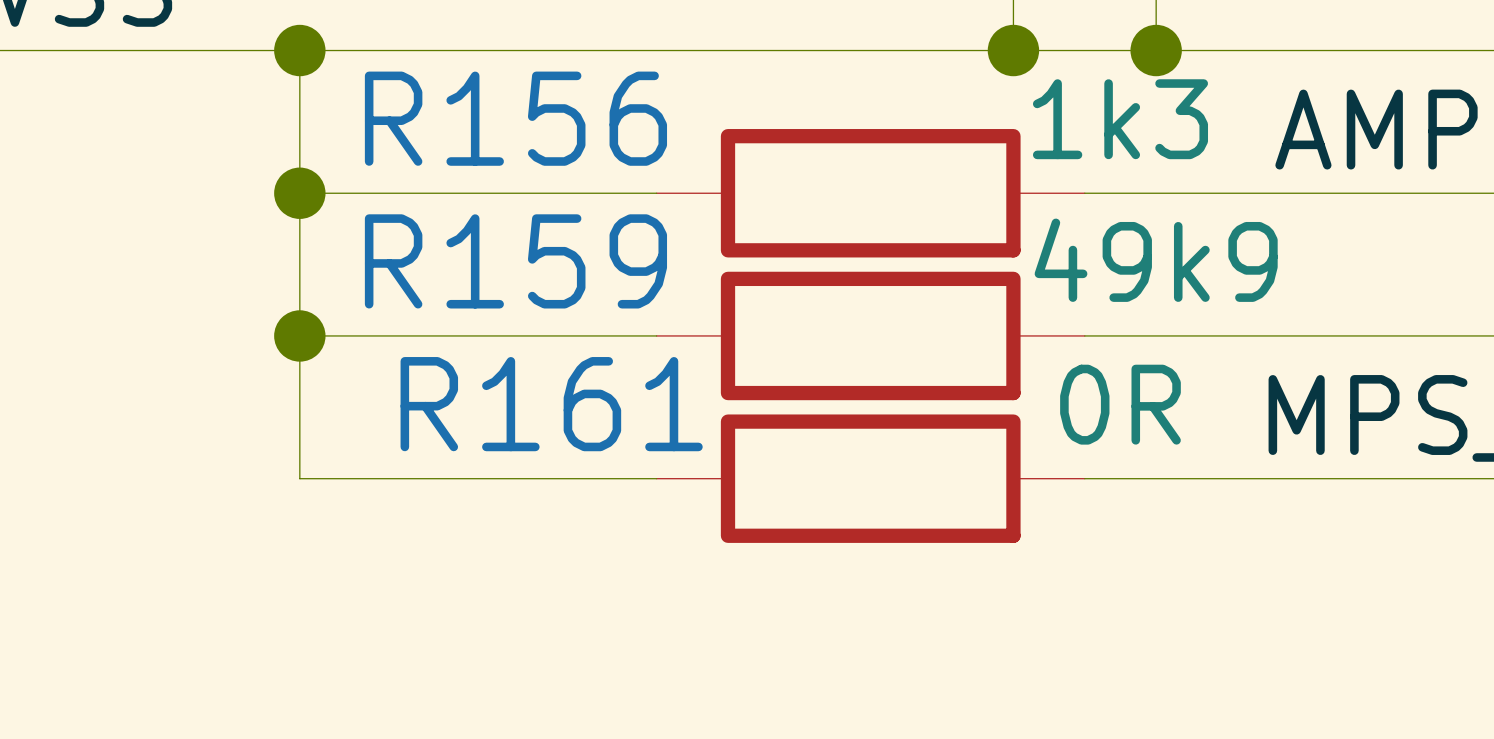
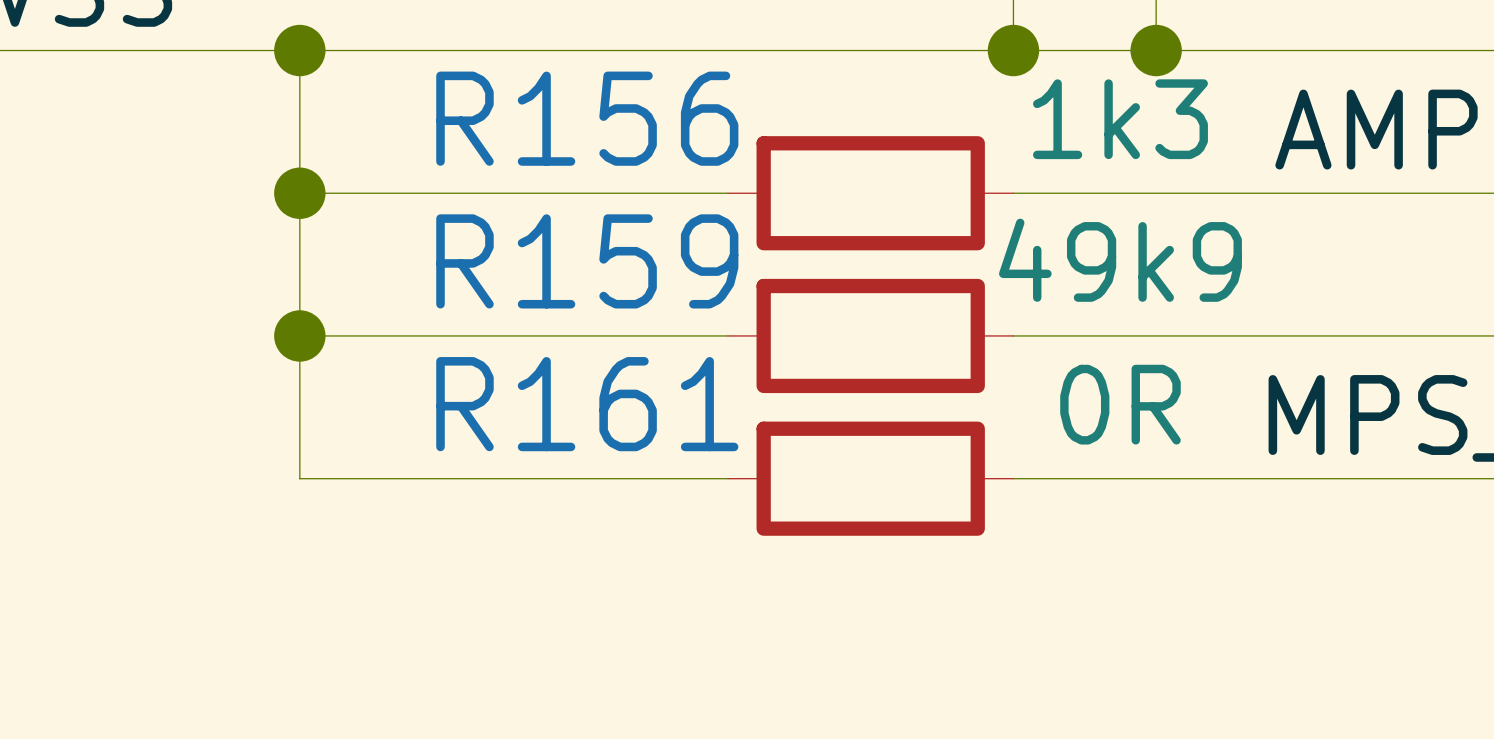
R156 symbol: [656, 129, 1085, 258] -> [727, 136, 1014, 251]
R159 symbol: [656, 271, 1085, 401] -> [727, 278, 1014, 394]
R161 symbol: [656, 414, 1085, 543] -> [727, 421, 1014, 536]

